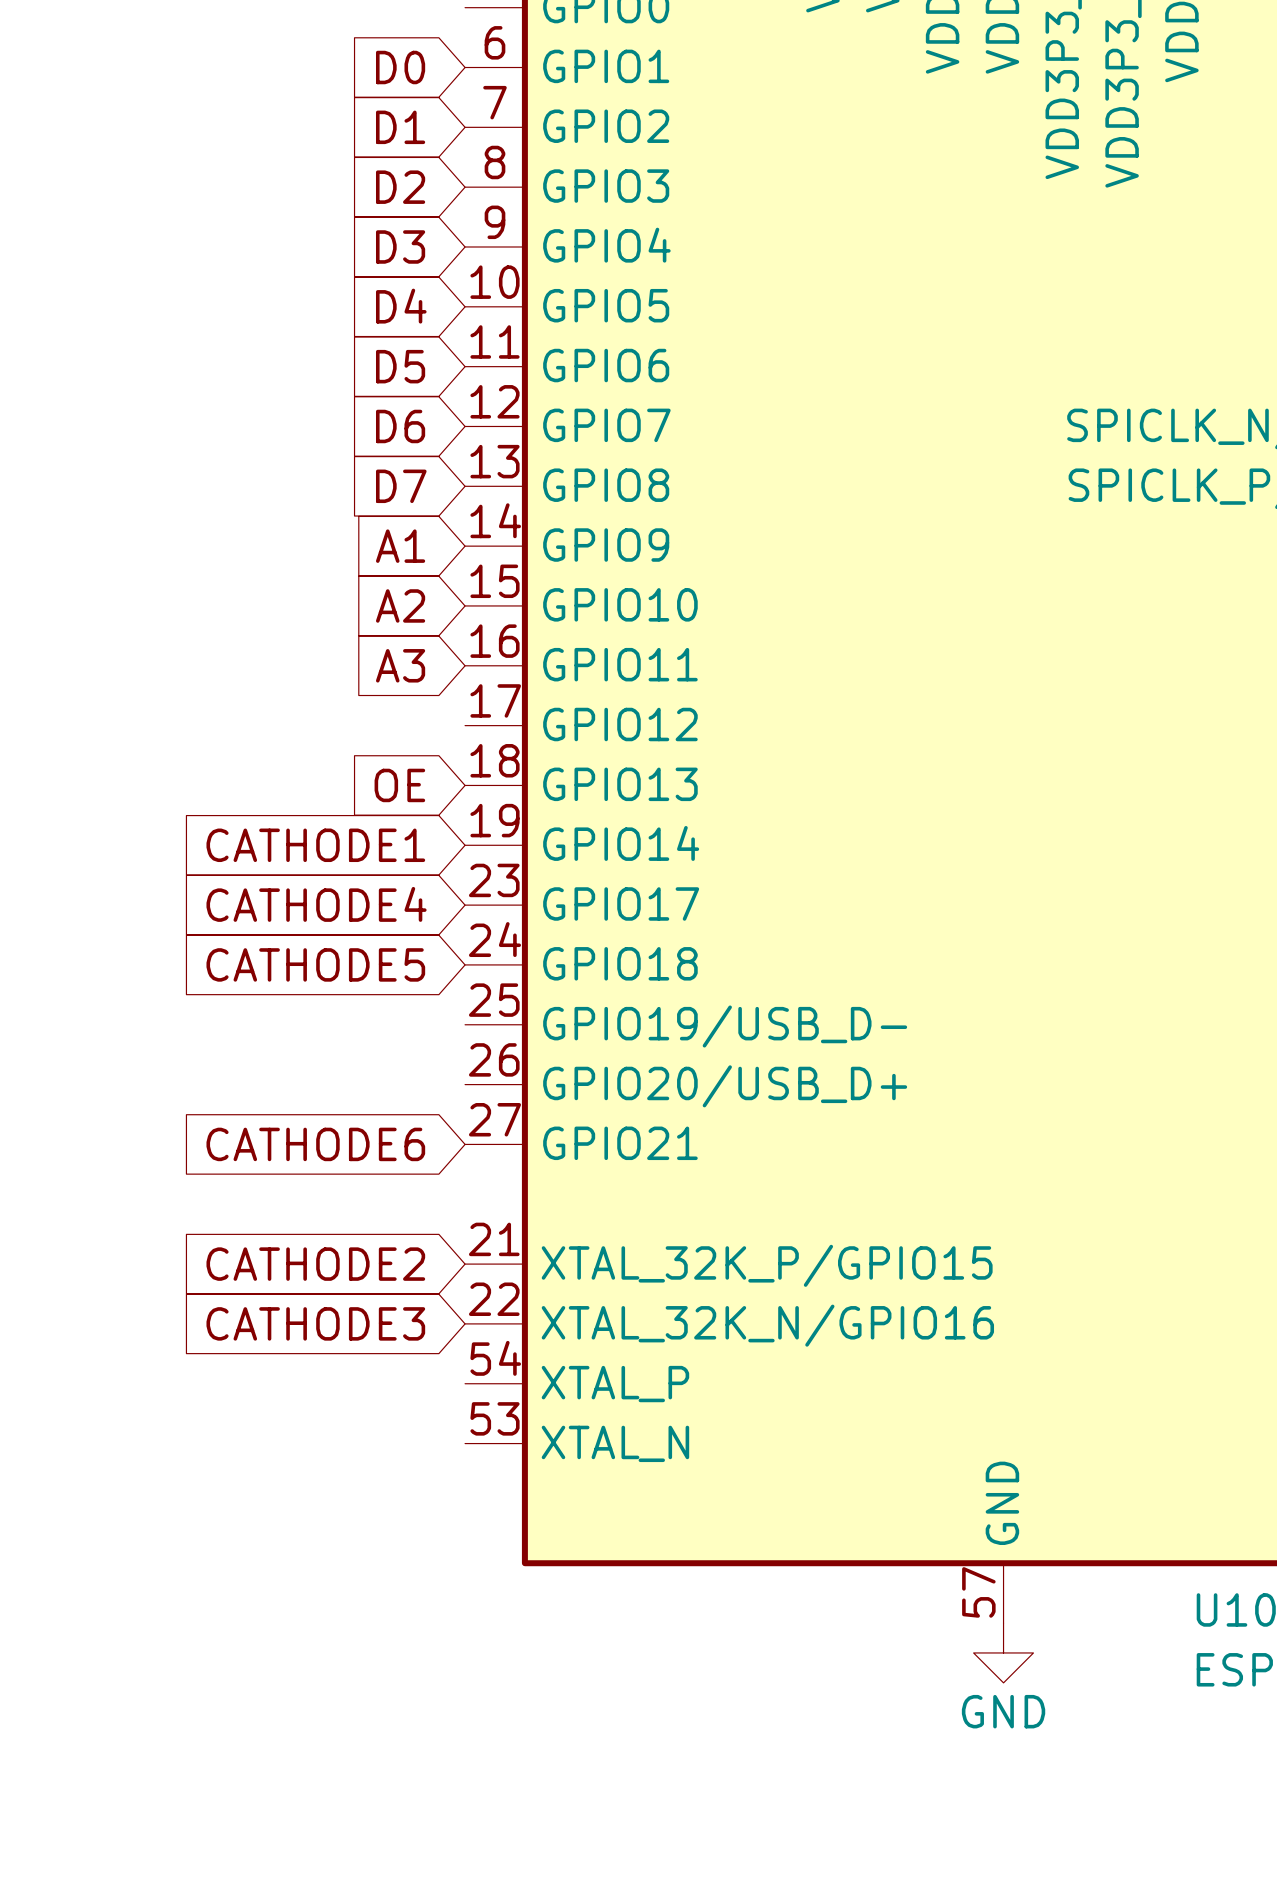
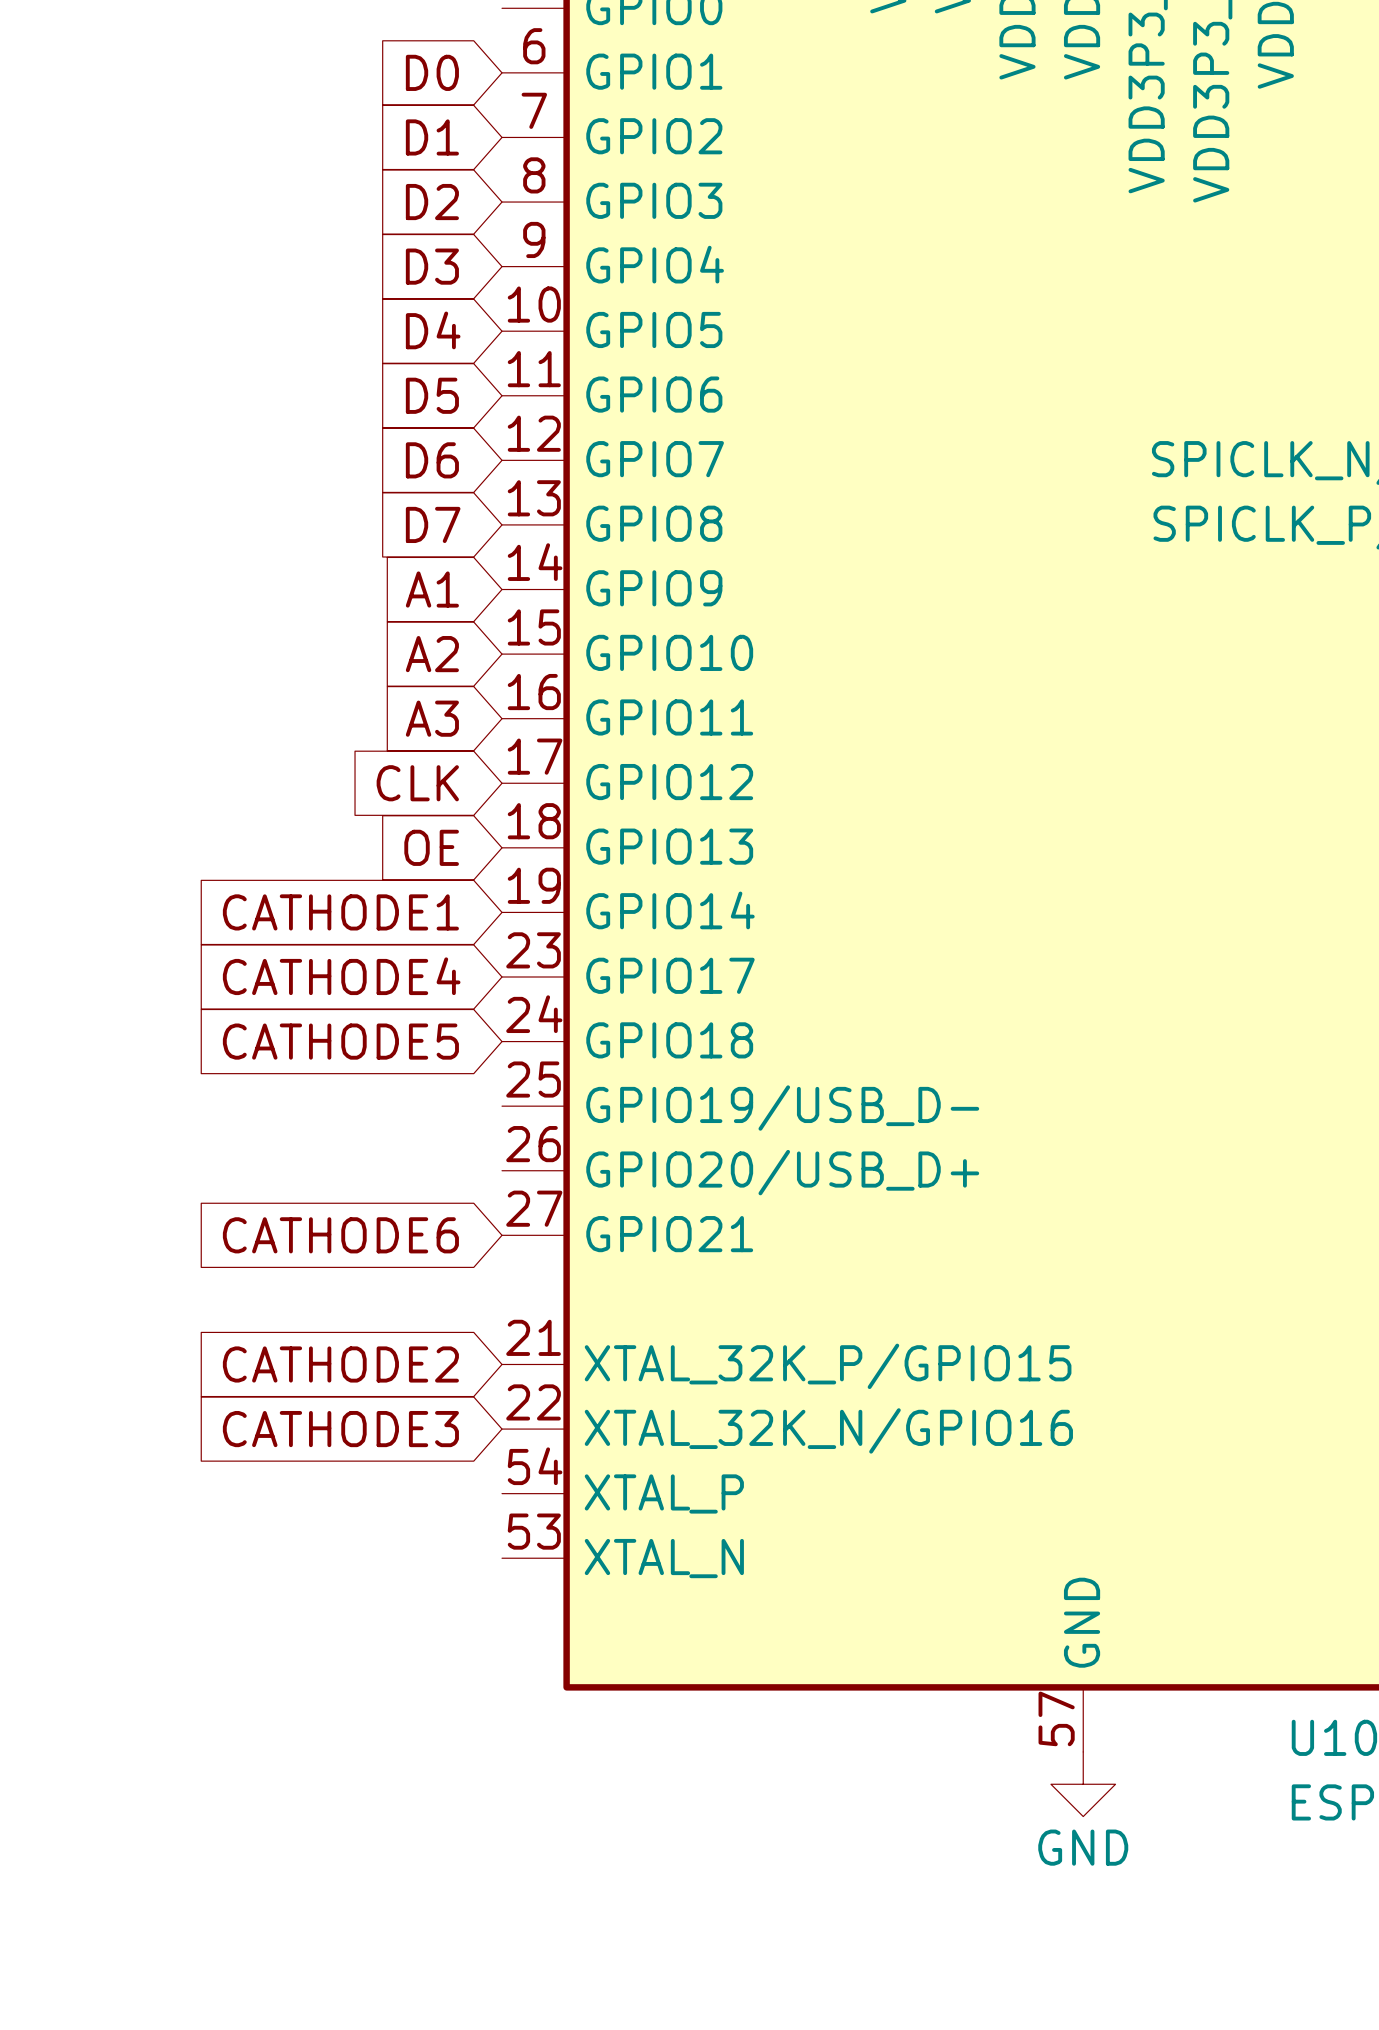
global label: none -> CLK (417, 783)

